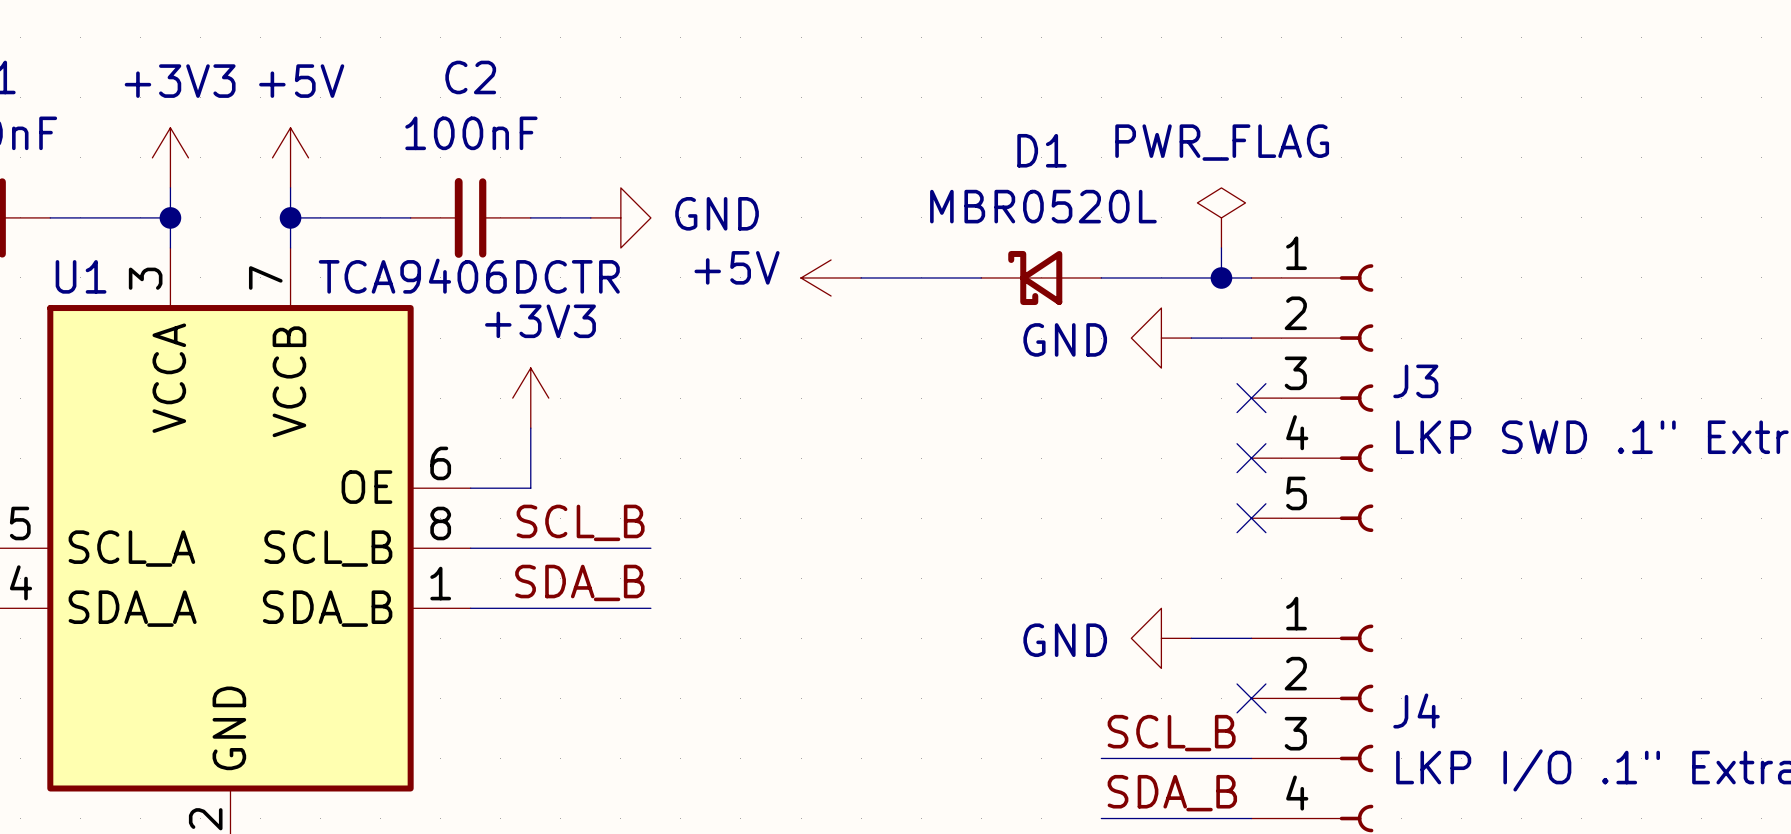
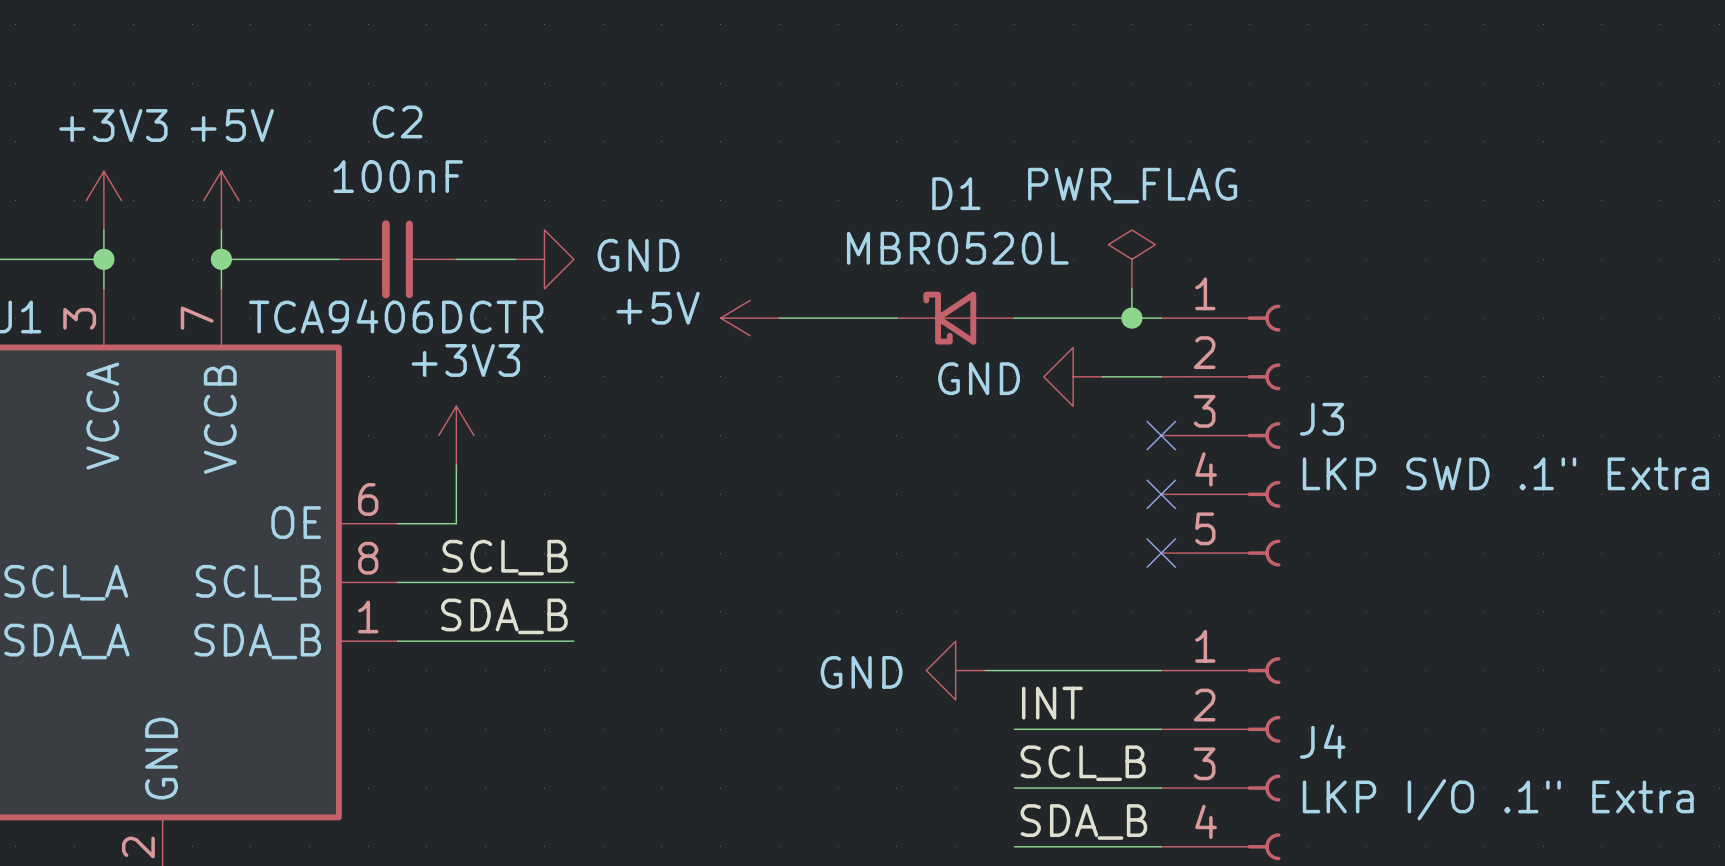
wire: none -> (985, 670) (1102, 670)
power symbol position: GND (1161, 638) -> GND (955, 670)
label: none -> INT (1052, 703)
wire: none -> (1014, 729) (1161, 729)
no-connect mark: (1251, 698) -> none

